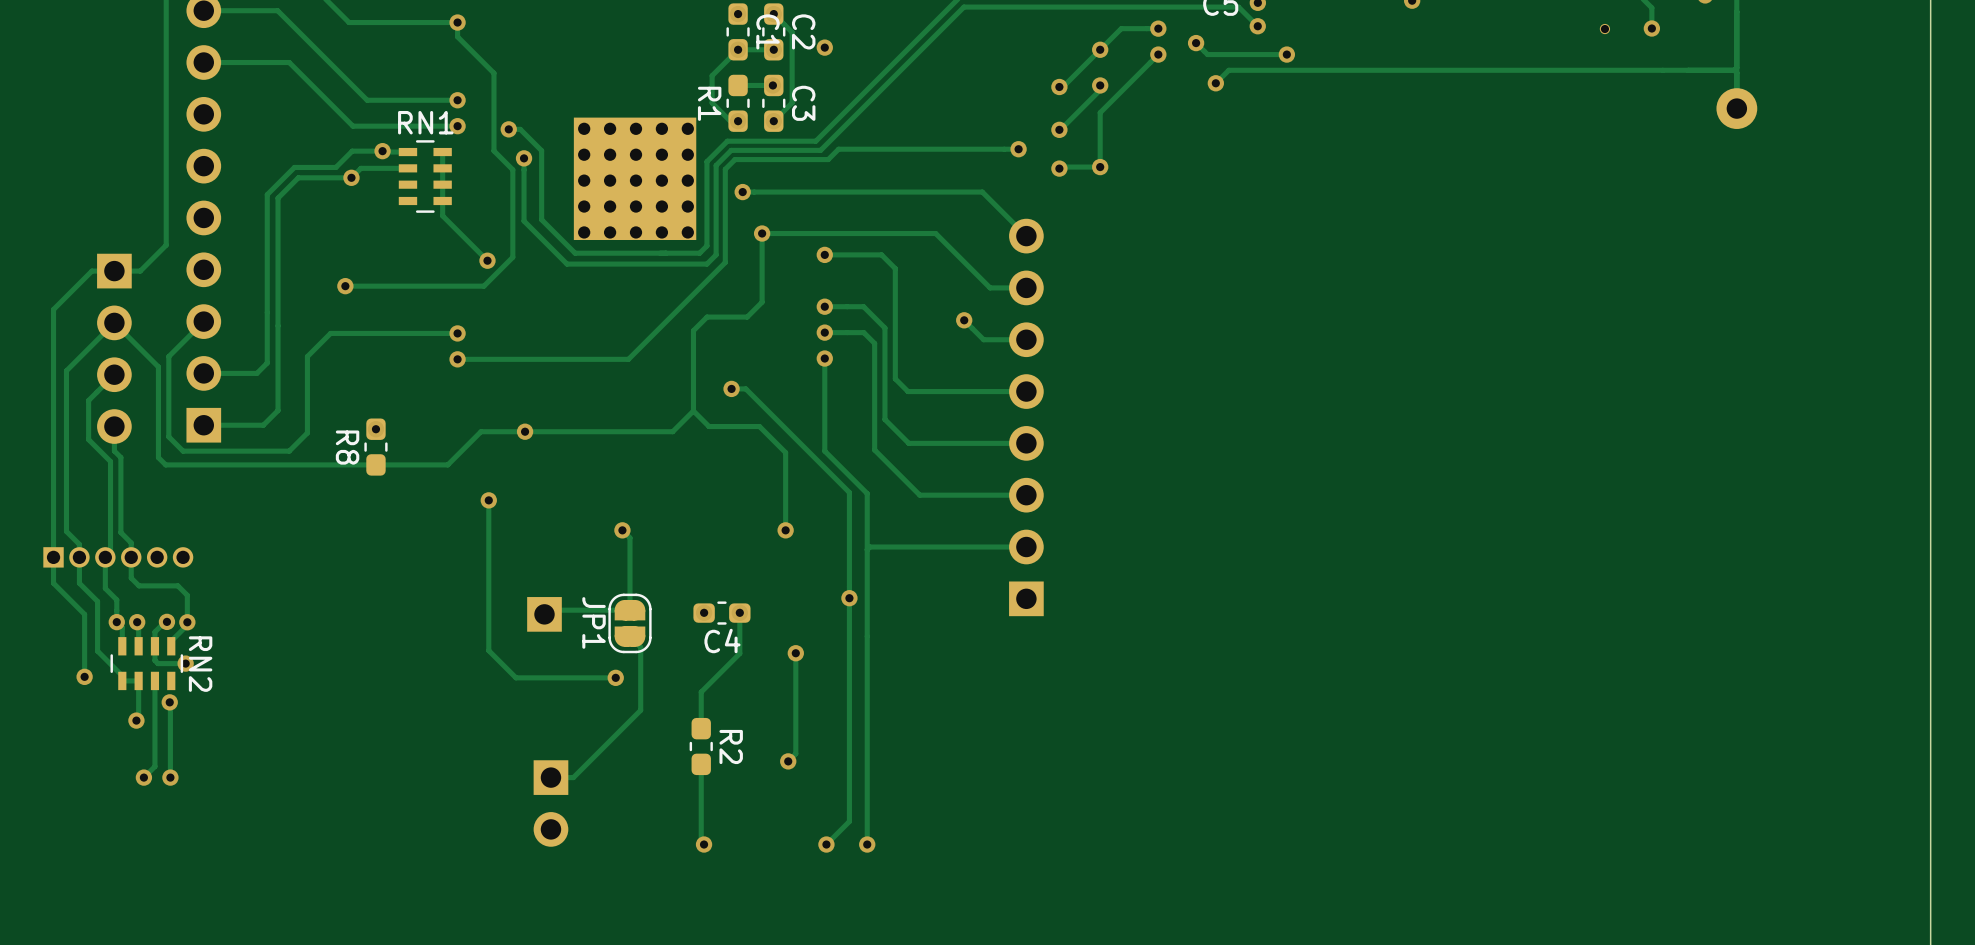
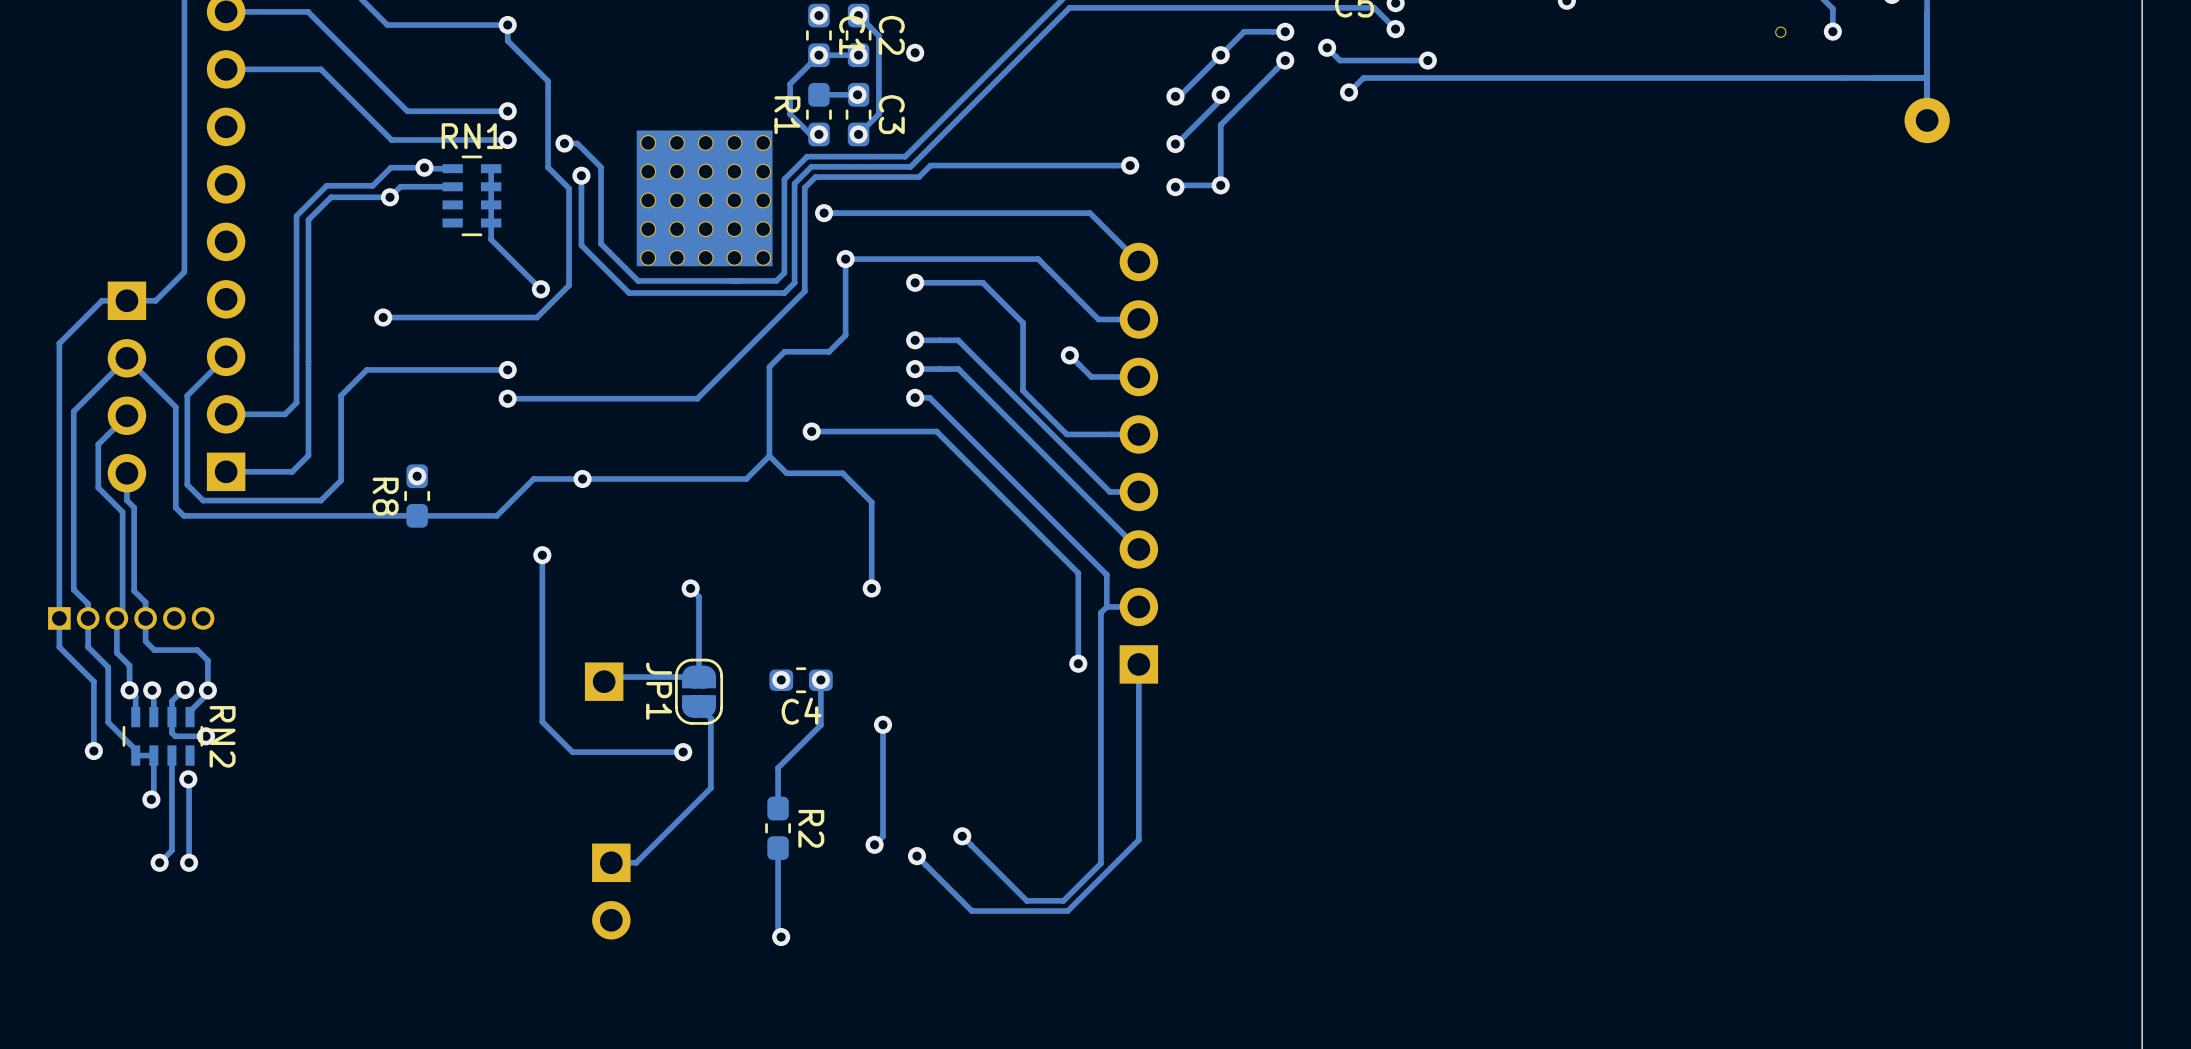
track: (881, 254) (895, 268) (895, 378) (908, 391) (961, 391) -> (978, 282) (982, 282) (1023, 322) (1023, 390) (1066, 434)
track: (884, 328) (884, 419) (908, 443) (1000, 443) -> (981, 364) (1109, 491)
track: (874, 343) (874, 450) (919, 495) (1026, 495) -> (970, 381) (1138, 549)
track: (824, 358) (824, 451) (867, 493) (867, 844) -> (915, 397) (929, 397) (1106, 574) (1106, 606) (1100, 612) (1100, 863) (1063, 900) (1026, 900) (962, 836)
track: (745, 388) (849, 492) (849, 821) (826, 844) -> (827, 431) (936, 431) (1078, 573) (1078, 663)
track: (997, 547) (869, 547) (867, 549) -> none
via: (849, 598) -> none
via: none -> (1078, 663)
track: none -> (1138, 664) (1138, 839) (1067, 911) (971, 911) (916, 856)
via: none -> (962, 836)
via: none -> (916, 856)
via: (826, 844) -> none
via: (867, 844) -> none

